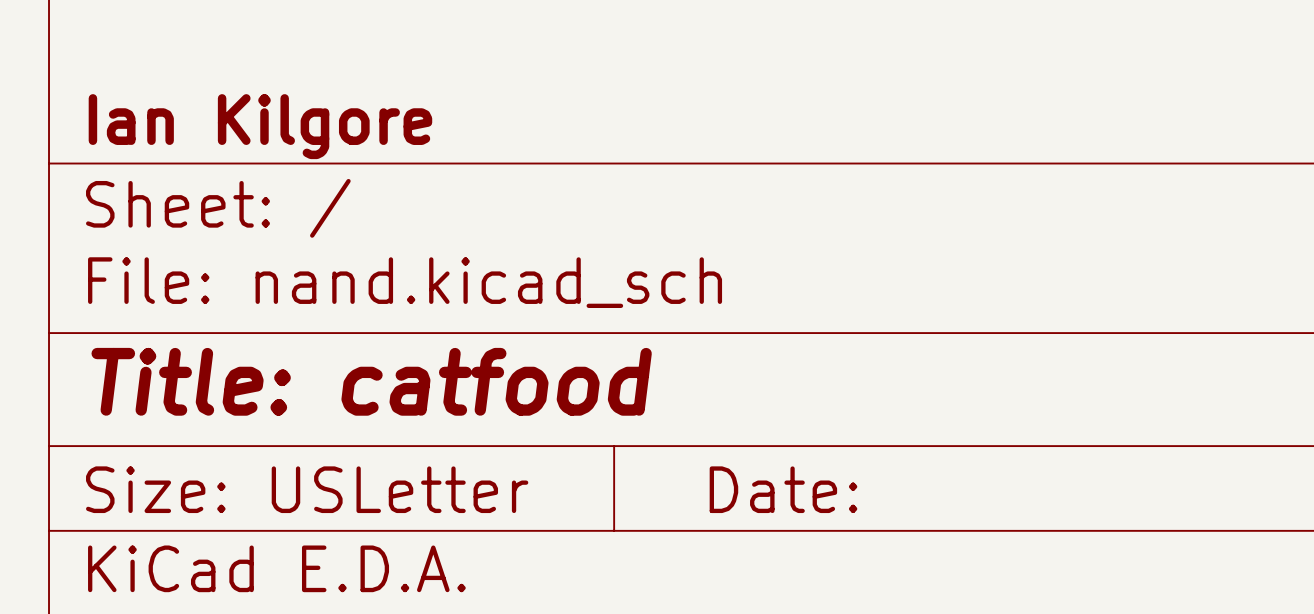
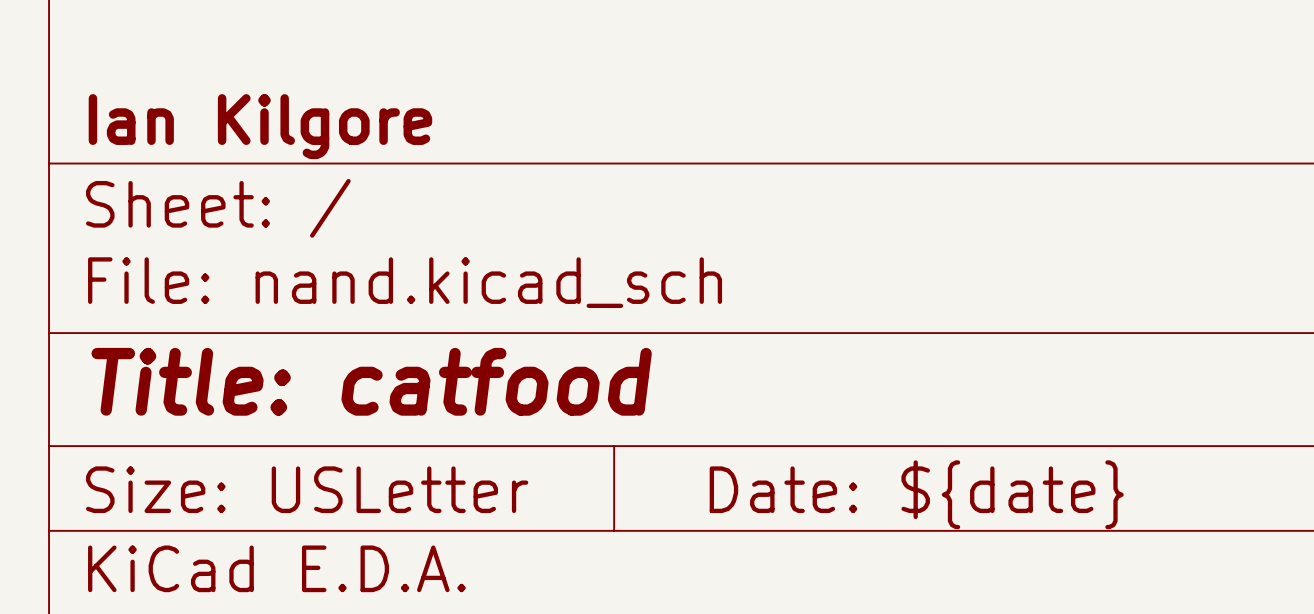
title block: Date: (783, 489) -> Date: ${date} (916, 494)

